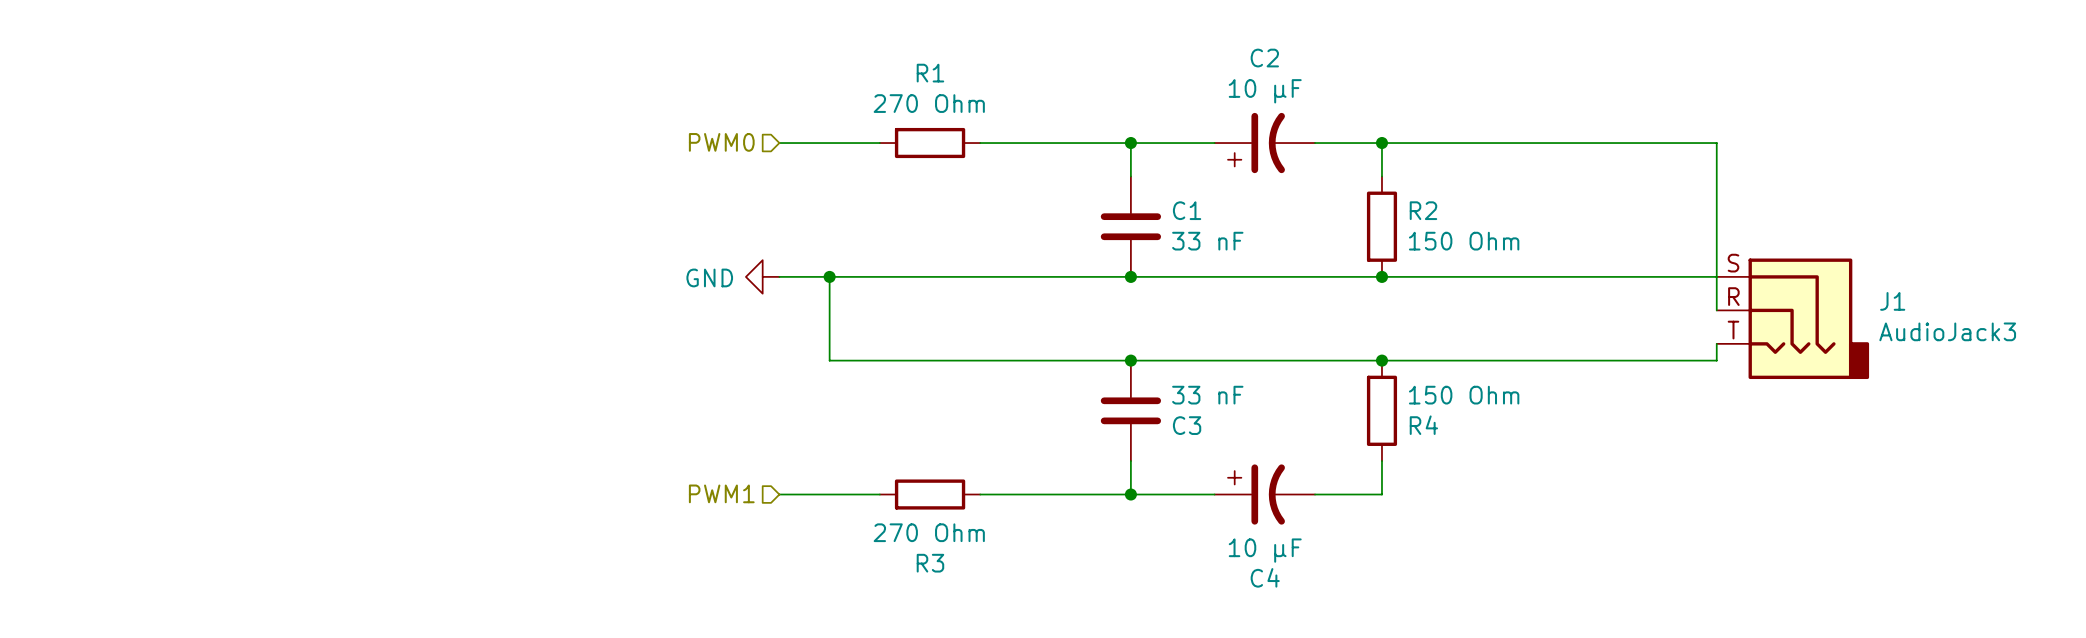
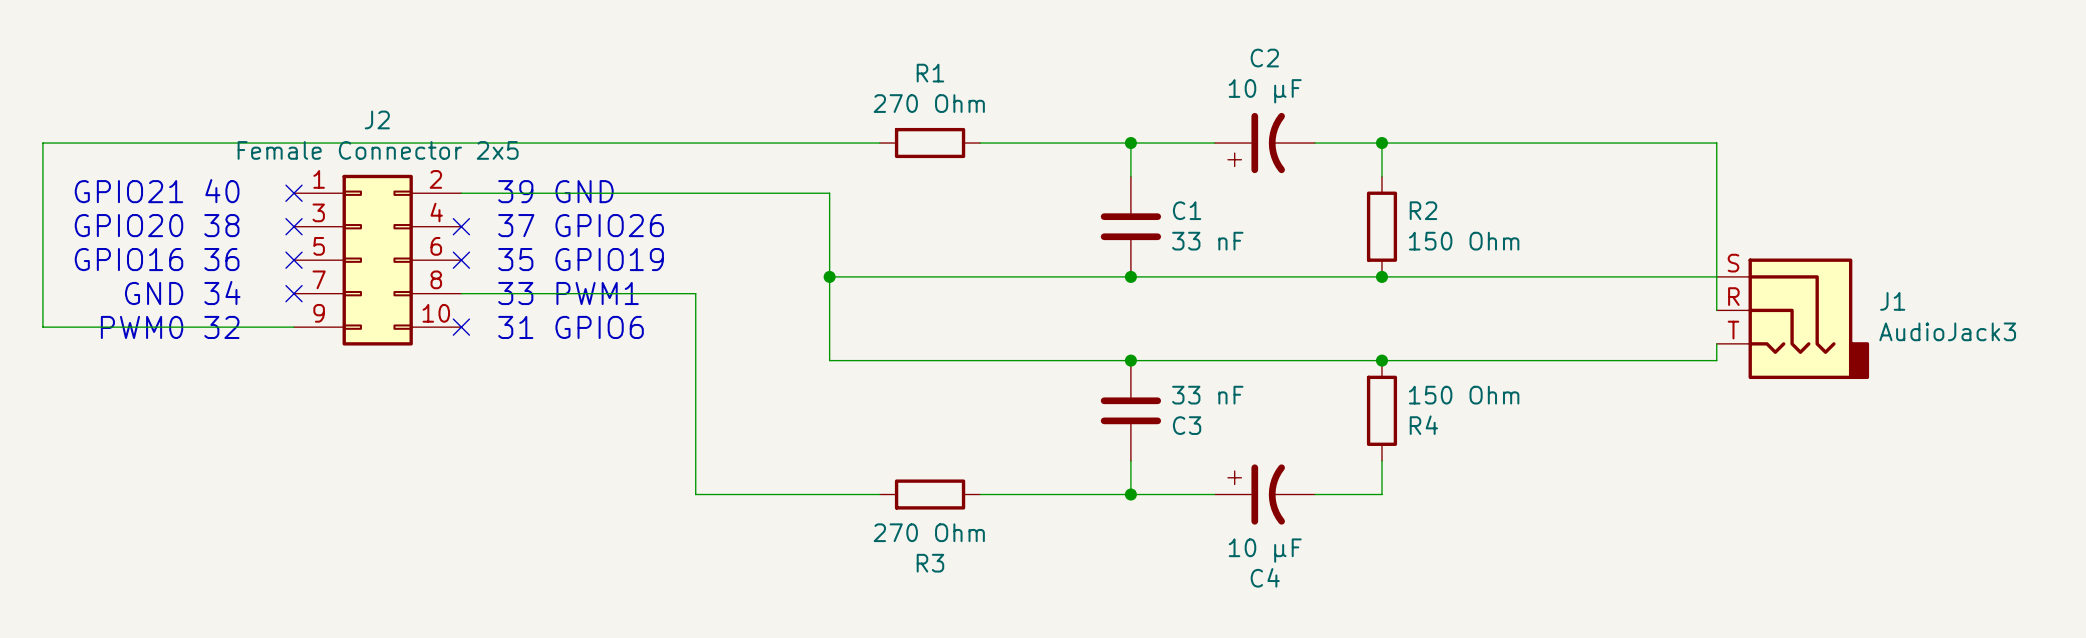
hierarchical label: PWM0 (721, 142) -> none
wire: none -> (779, 143) (42, 143) (42, 327) (294, 327)
text: none -> GPIO21 40 (157, 191)
text: none -> 39 GND (555, 191)
no-connect mark: none -> (294, 193)
text: none -> GPIO20 38 (157, 225)
text: none -> 37 GPIO26 (581, 225)
no-connect mark: none -> (294, 226)
no-connect mark: none -> (461, 226)
text: none -> GPIO16 36 (157, 259)
text: none -> 35 GPIO19 (581, 259)
no-connect mark: none -> (294, 260)
J2: none -> Female Connector 2x5 (377, 260)
no-connect mark: none -> (461, 260)
power symbol: GND (762, 276) -> none
wire: (779, 276) (829, 276) -> (461, 193) (829, 193) (829, 276)
text: none -> GND 34 (182, 292)
no-connect mark: none -> (294, 293)
wire: none -> (461, 293) (695, 293) (695, 494) (779, 494)
text: none -> 33 PWM1 (568, 293)
text: none -> PWM0 32 (170, 327)
no-connect mark: none -> (461, 327)
text: none -> 31 GPIO6 (571, 327)
hierarchical label: PWM1 (721, 493) -> none

